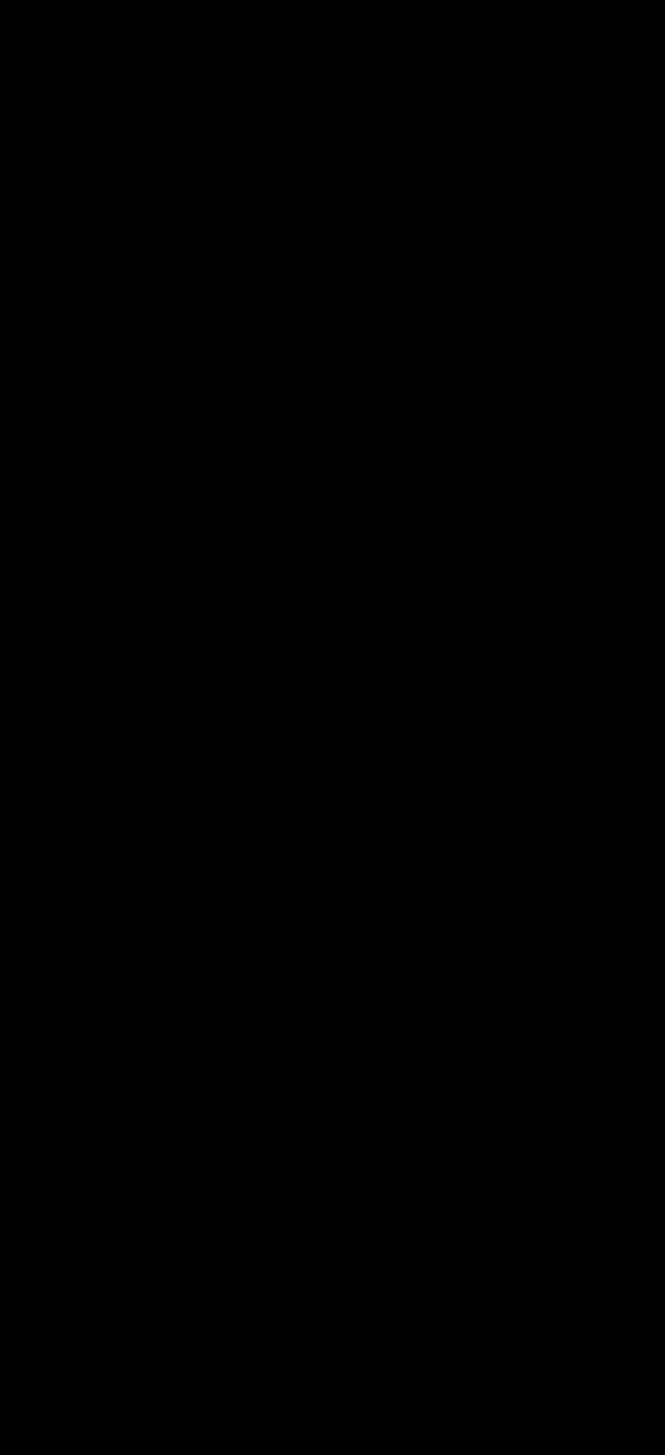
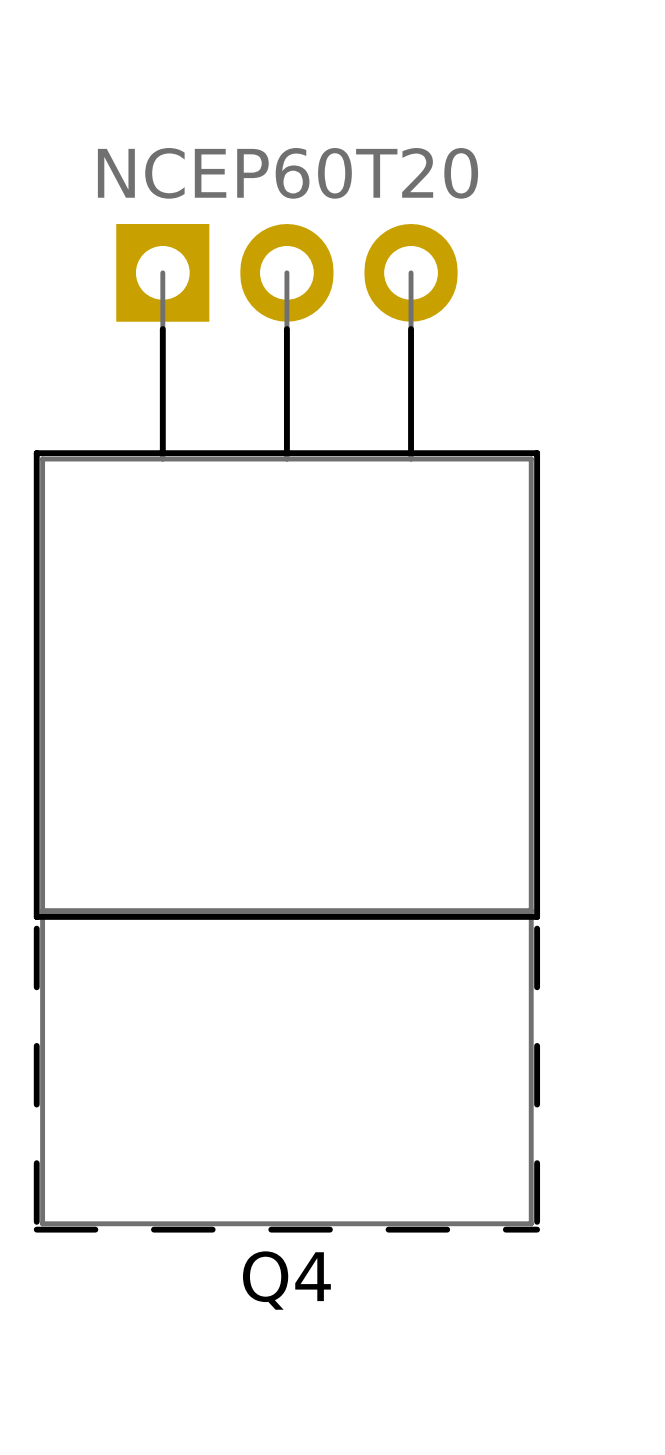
Q4: none -> NCEP60T20 (286, 728)

